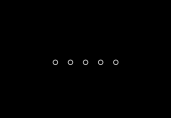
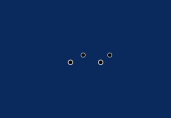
via: none -> (83, 55)
via: none -> (109, 55)
via: (55, 62) -> none
via: (85, 62) -> none
via: (115, 62) -> none

